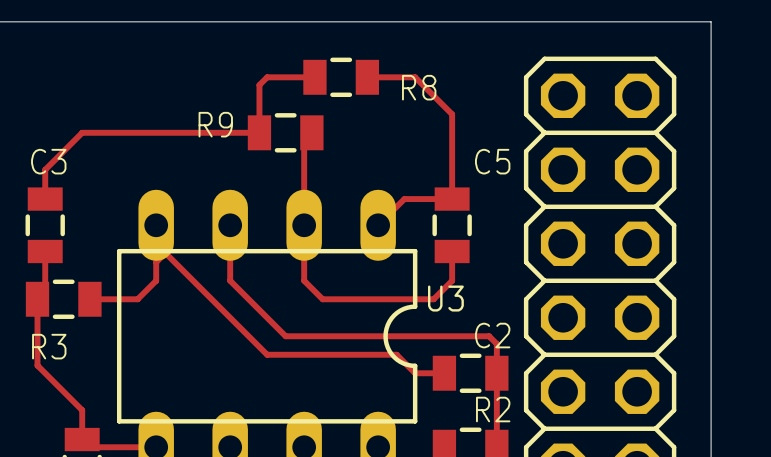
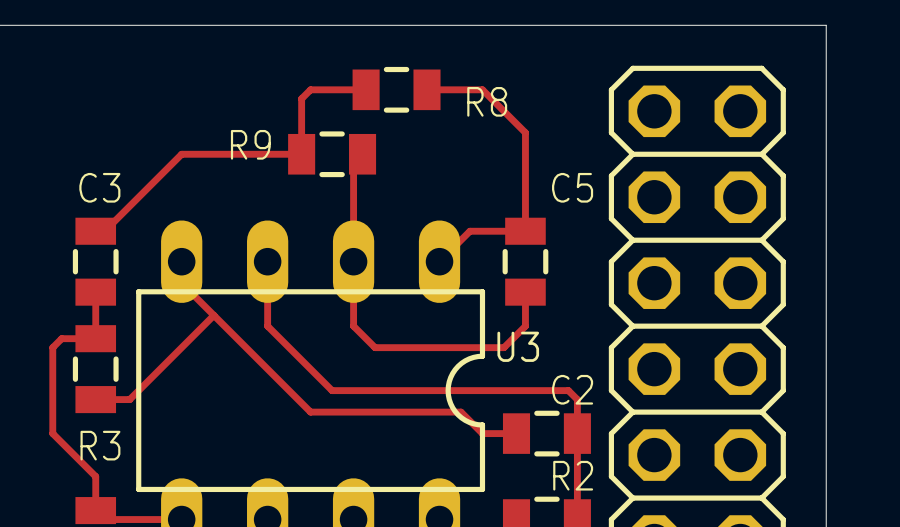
track: (156, 132) (82, 132) (45, 169) (45, 199) -> (181, 154) (104, 231) (95, 231)
C3 position: (45, 225) -> (95, 261)
track: (45, 251) (45, 291) (37, 299) (37, 365) (45, 373) -> (95, 292) (95, 338) (61, 338) (52, 347) (52, 433)
track: (165, 253) (156, 262) (156, 280) (137, 299) (89, 299) -> none
track: none -> (213, 315) (129, 399) (95, 399)
R3 rotation: 0° (63, 299) -> 90° clockwise (95, 369)

